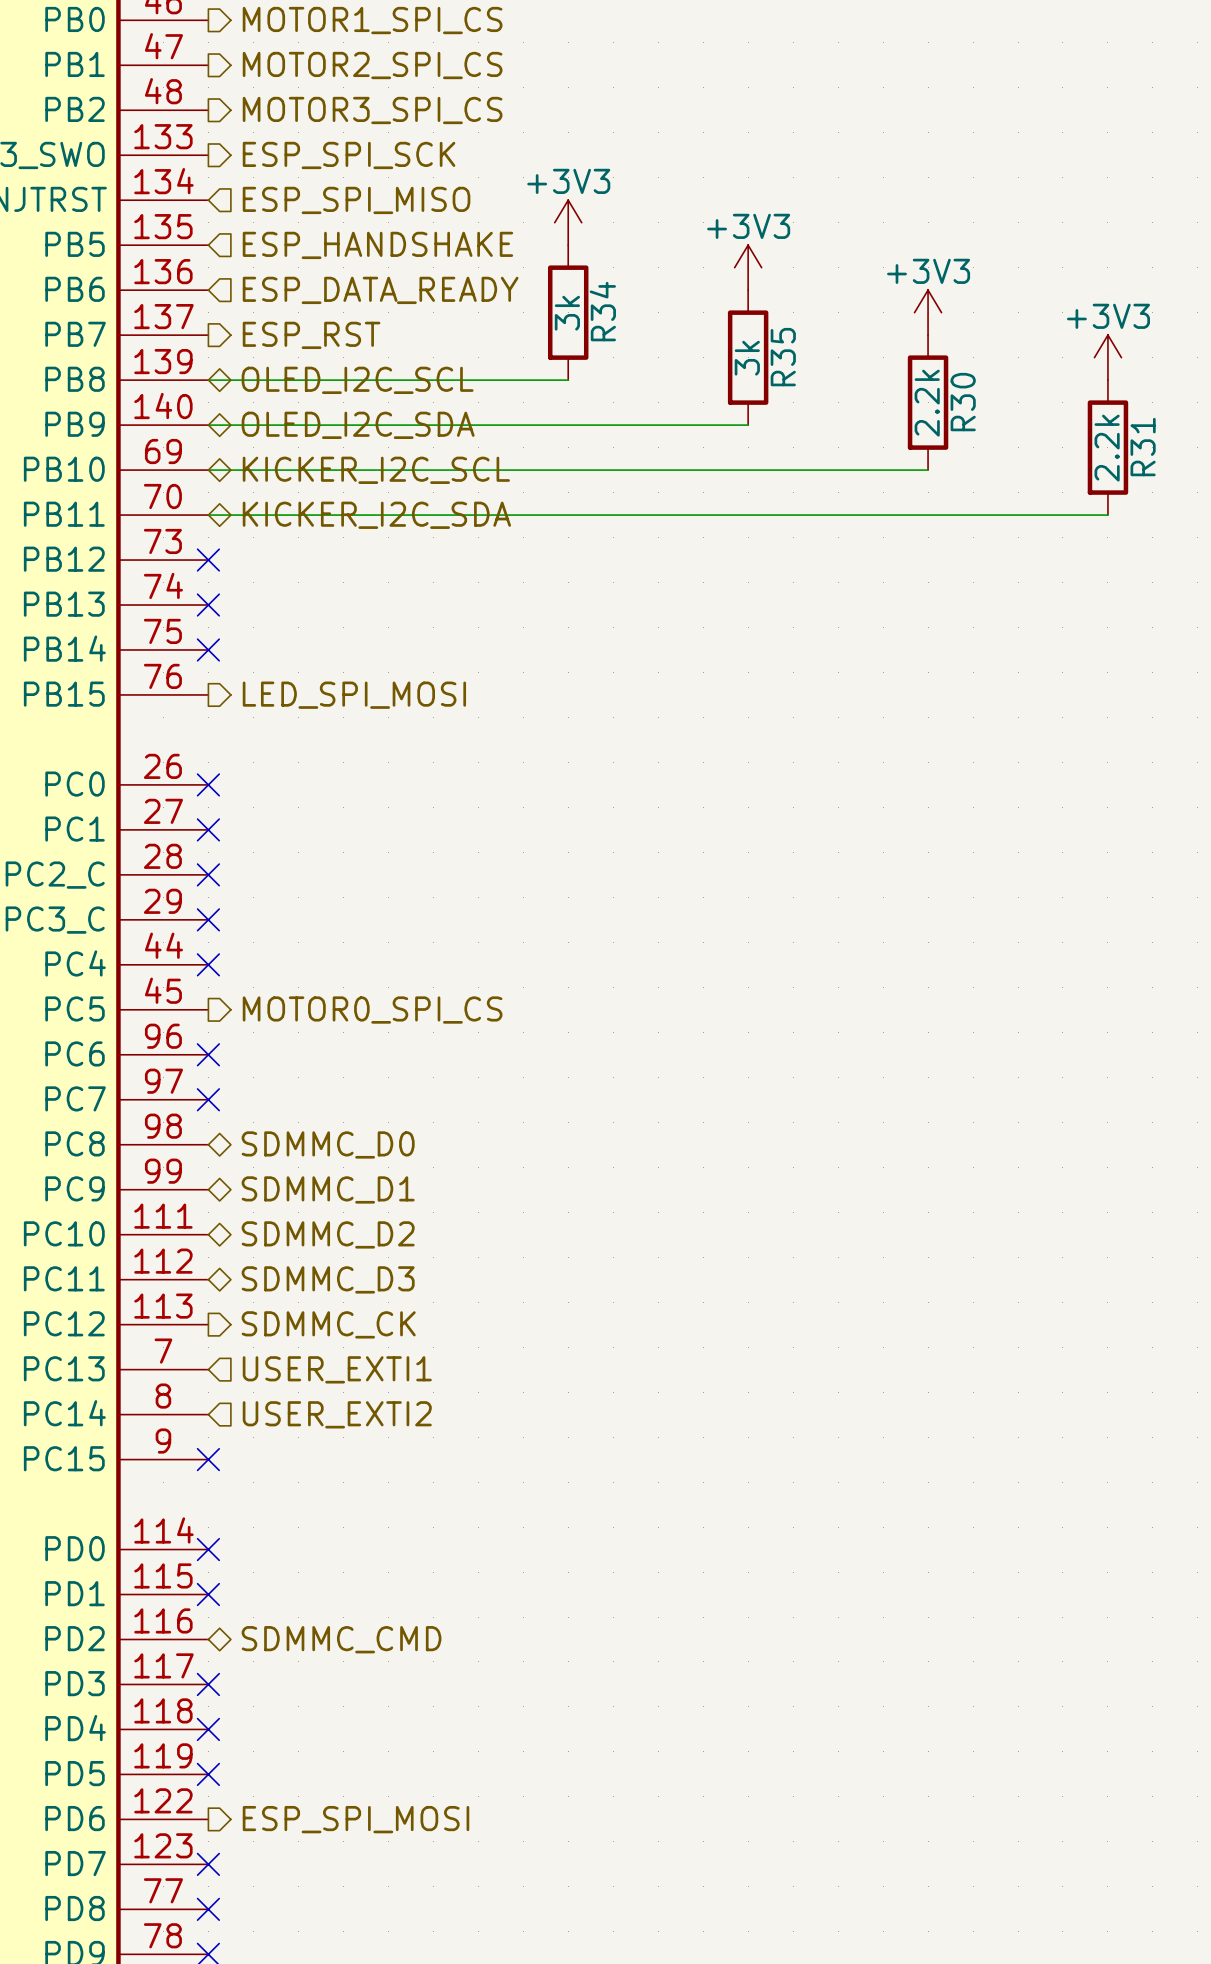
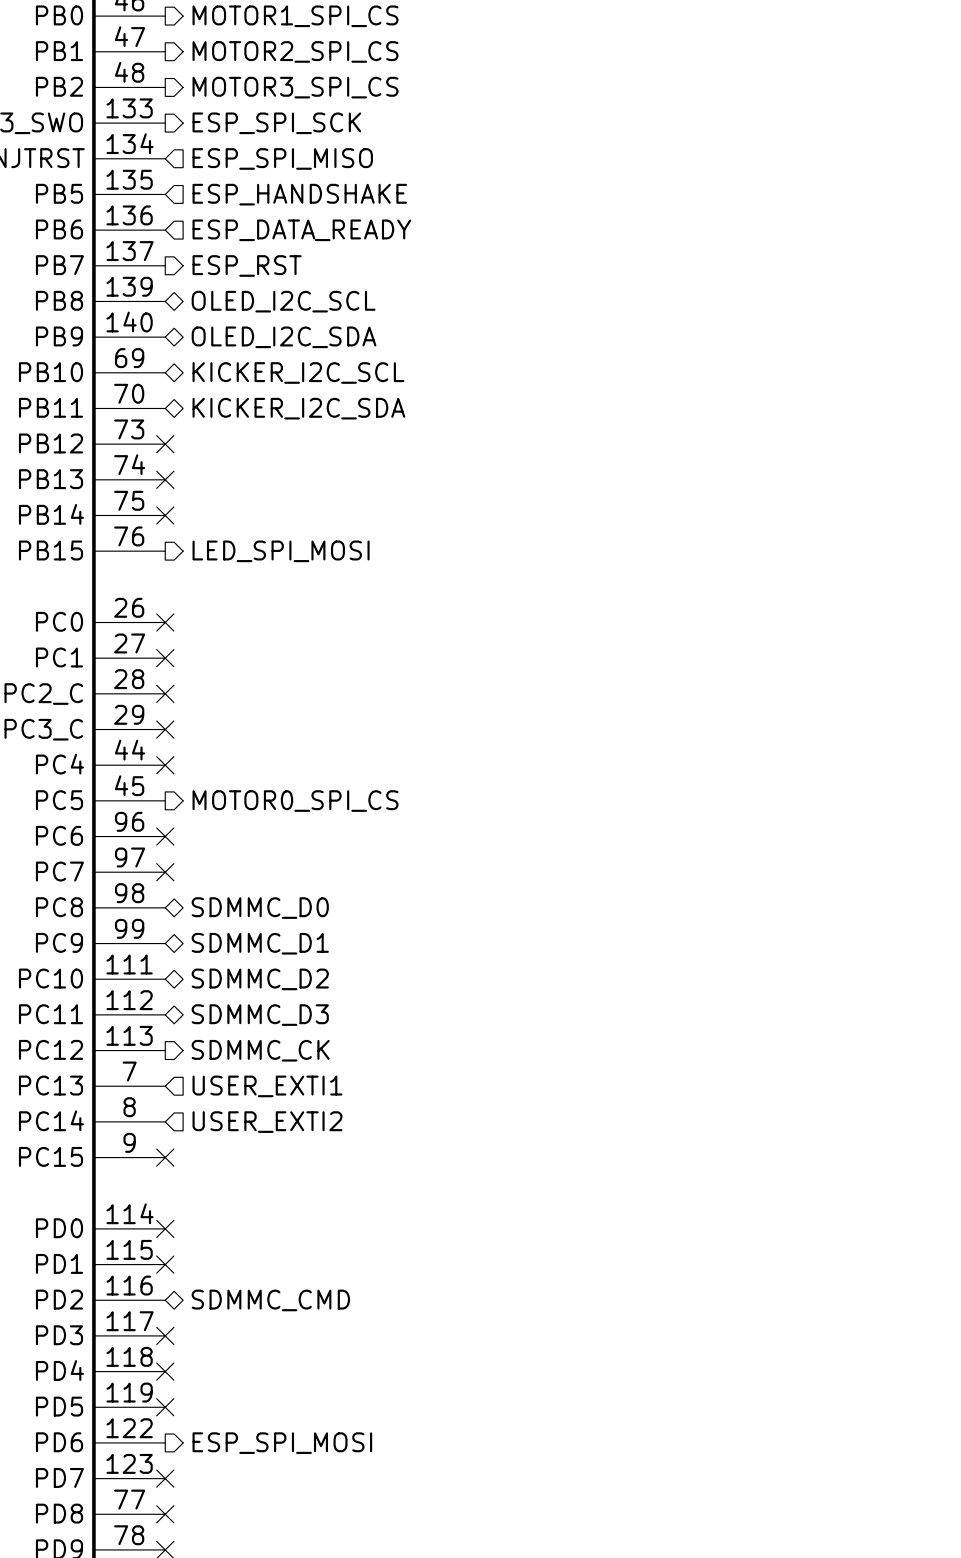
power symbol: +3V3 (568, 222) -> none
power symbol: +3V3 (748, 267) -> none
R34: 3k (568, 312) -> none
power symbol: +3V3 (928, 312) -> none
R35: 3k (748, 357) -> none
power symbol: +3V3 (1107, 357) -> none
wire: (208, 380) (568, 380) -> none
R30: 2.2k (928, 402) -> none
wire: (208, 425) (748, 425) -> none
R31: 2.2k (1107, 447) -> none
wire: (208, 470) (928, 470) -> none
wire: (208, 515) (1107, 515) -> none

